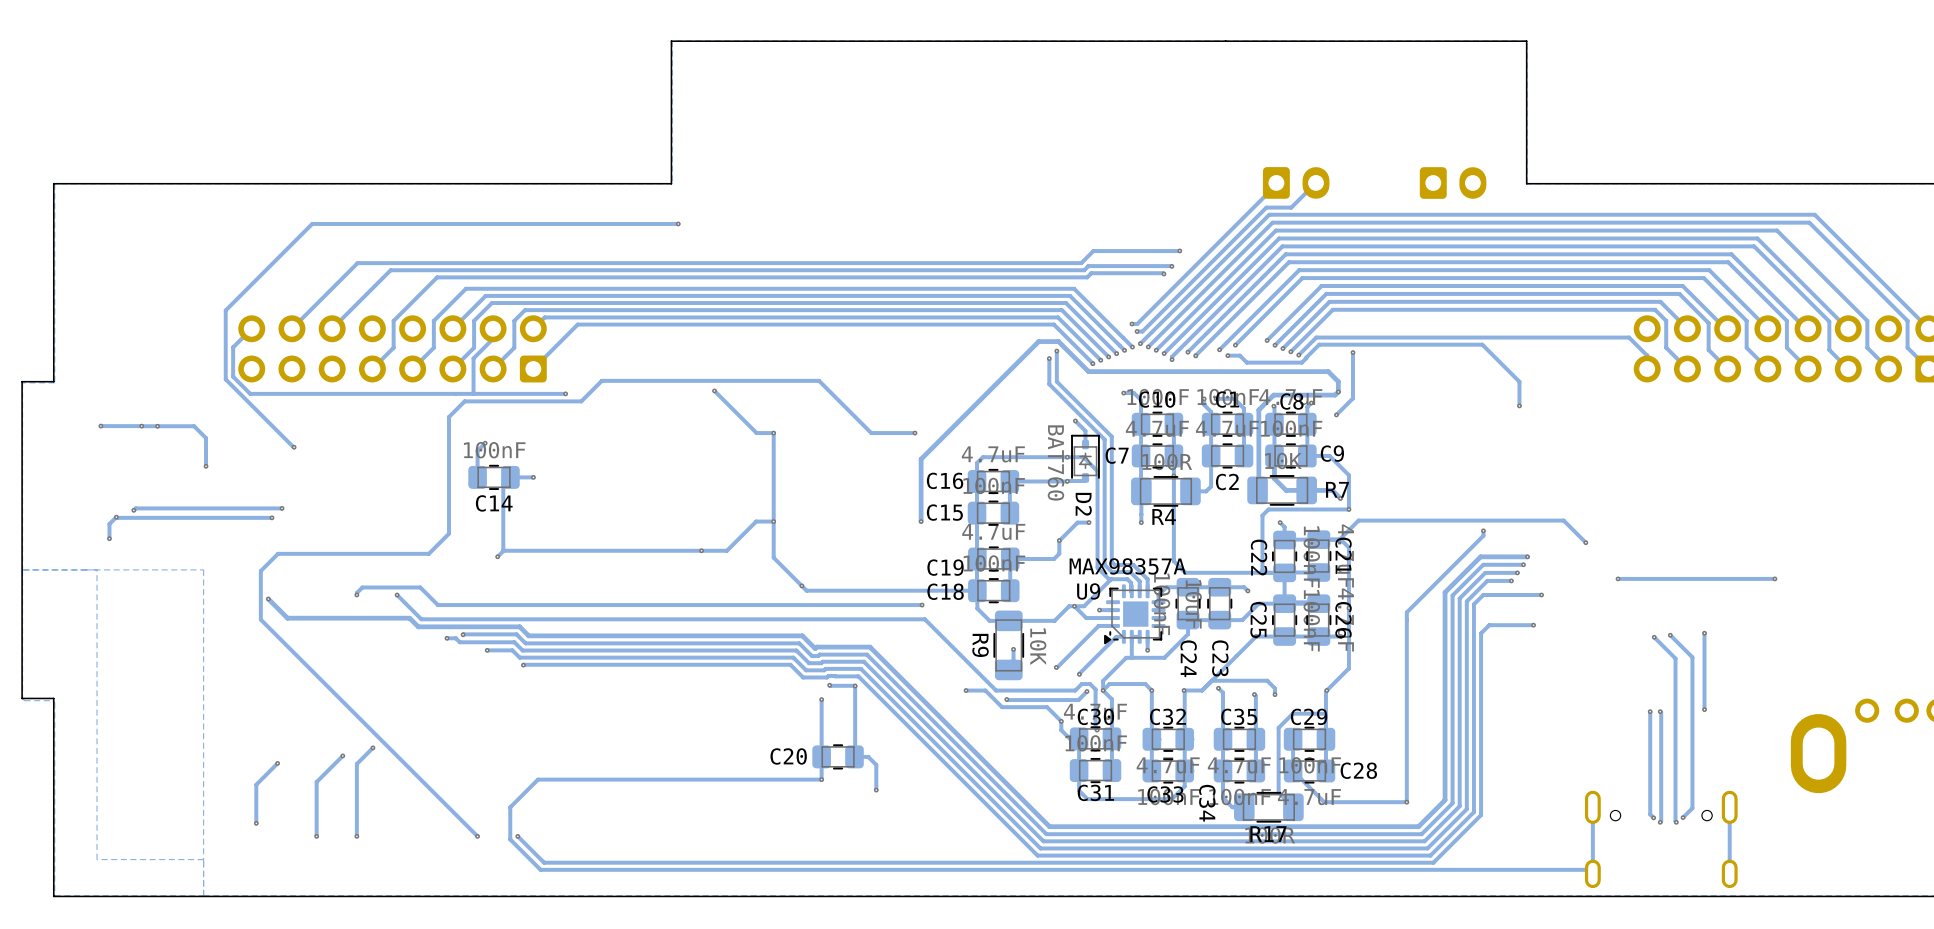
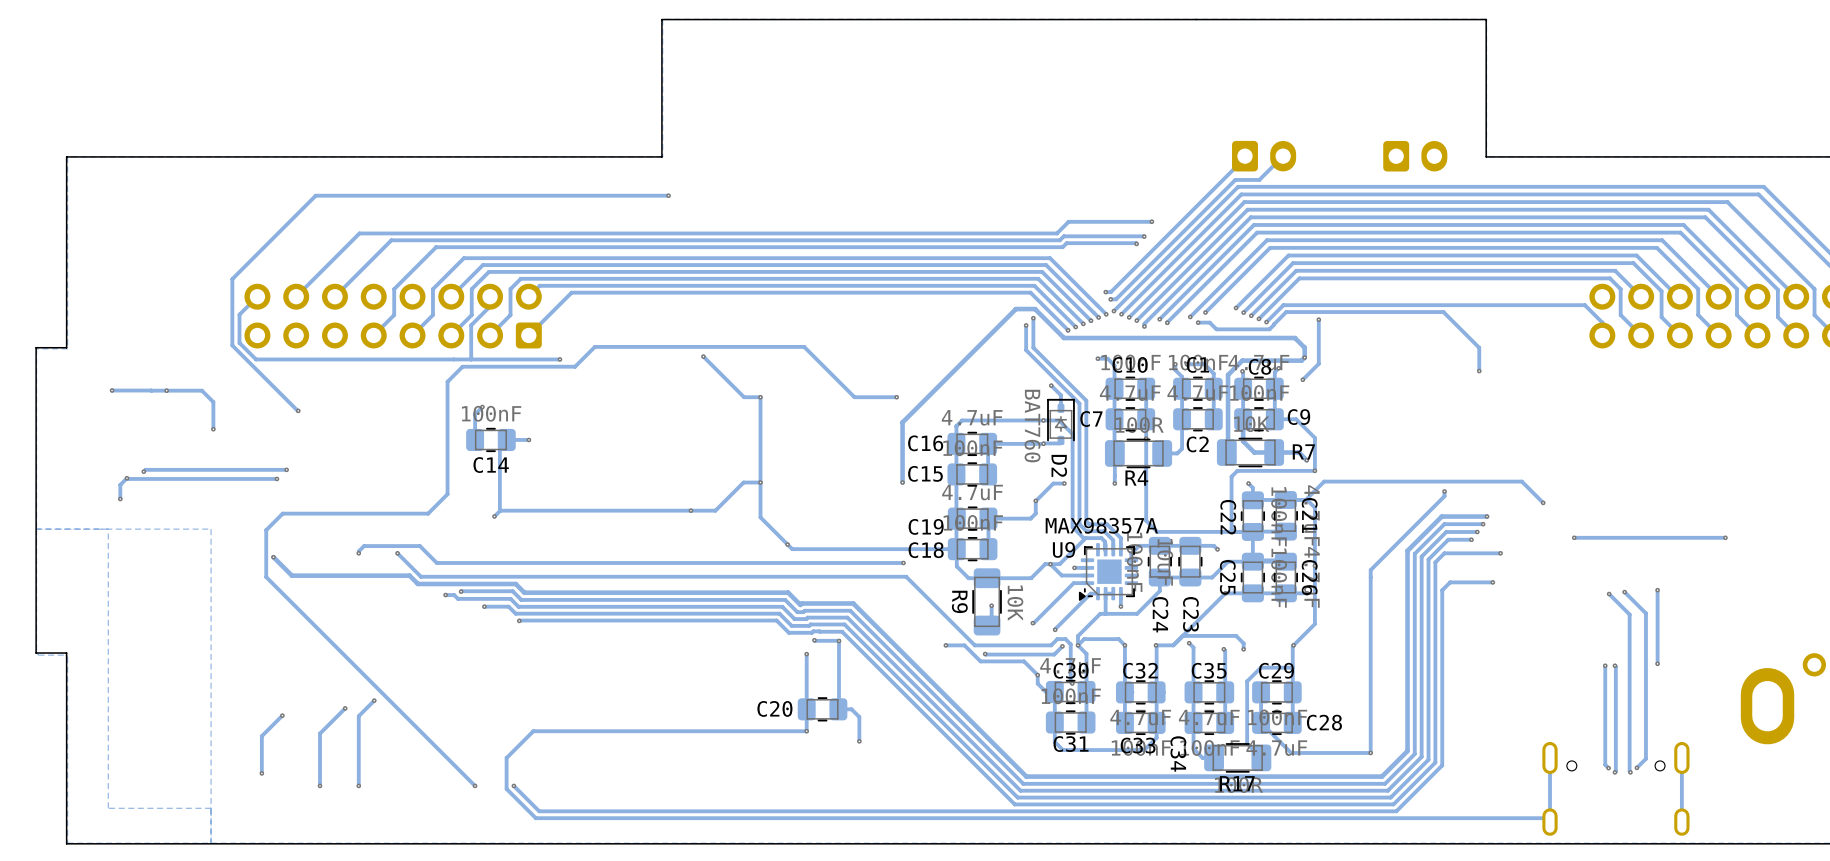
via: (141, 426) -> none

